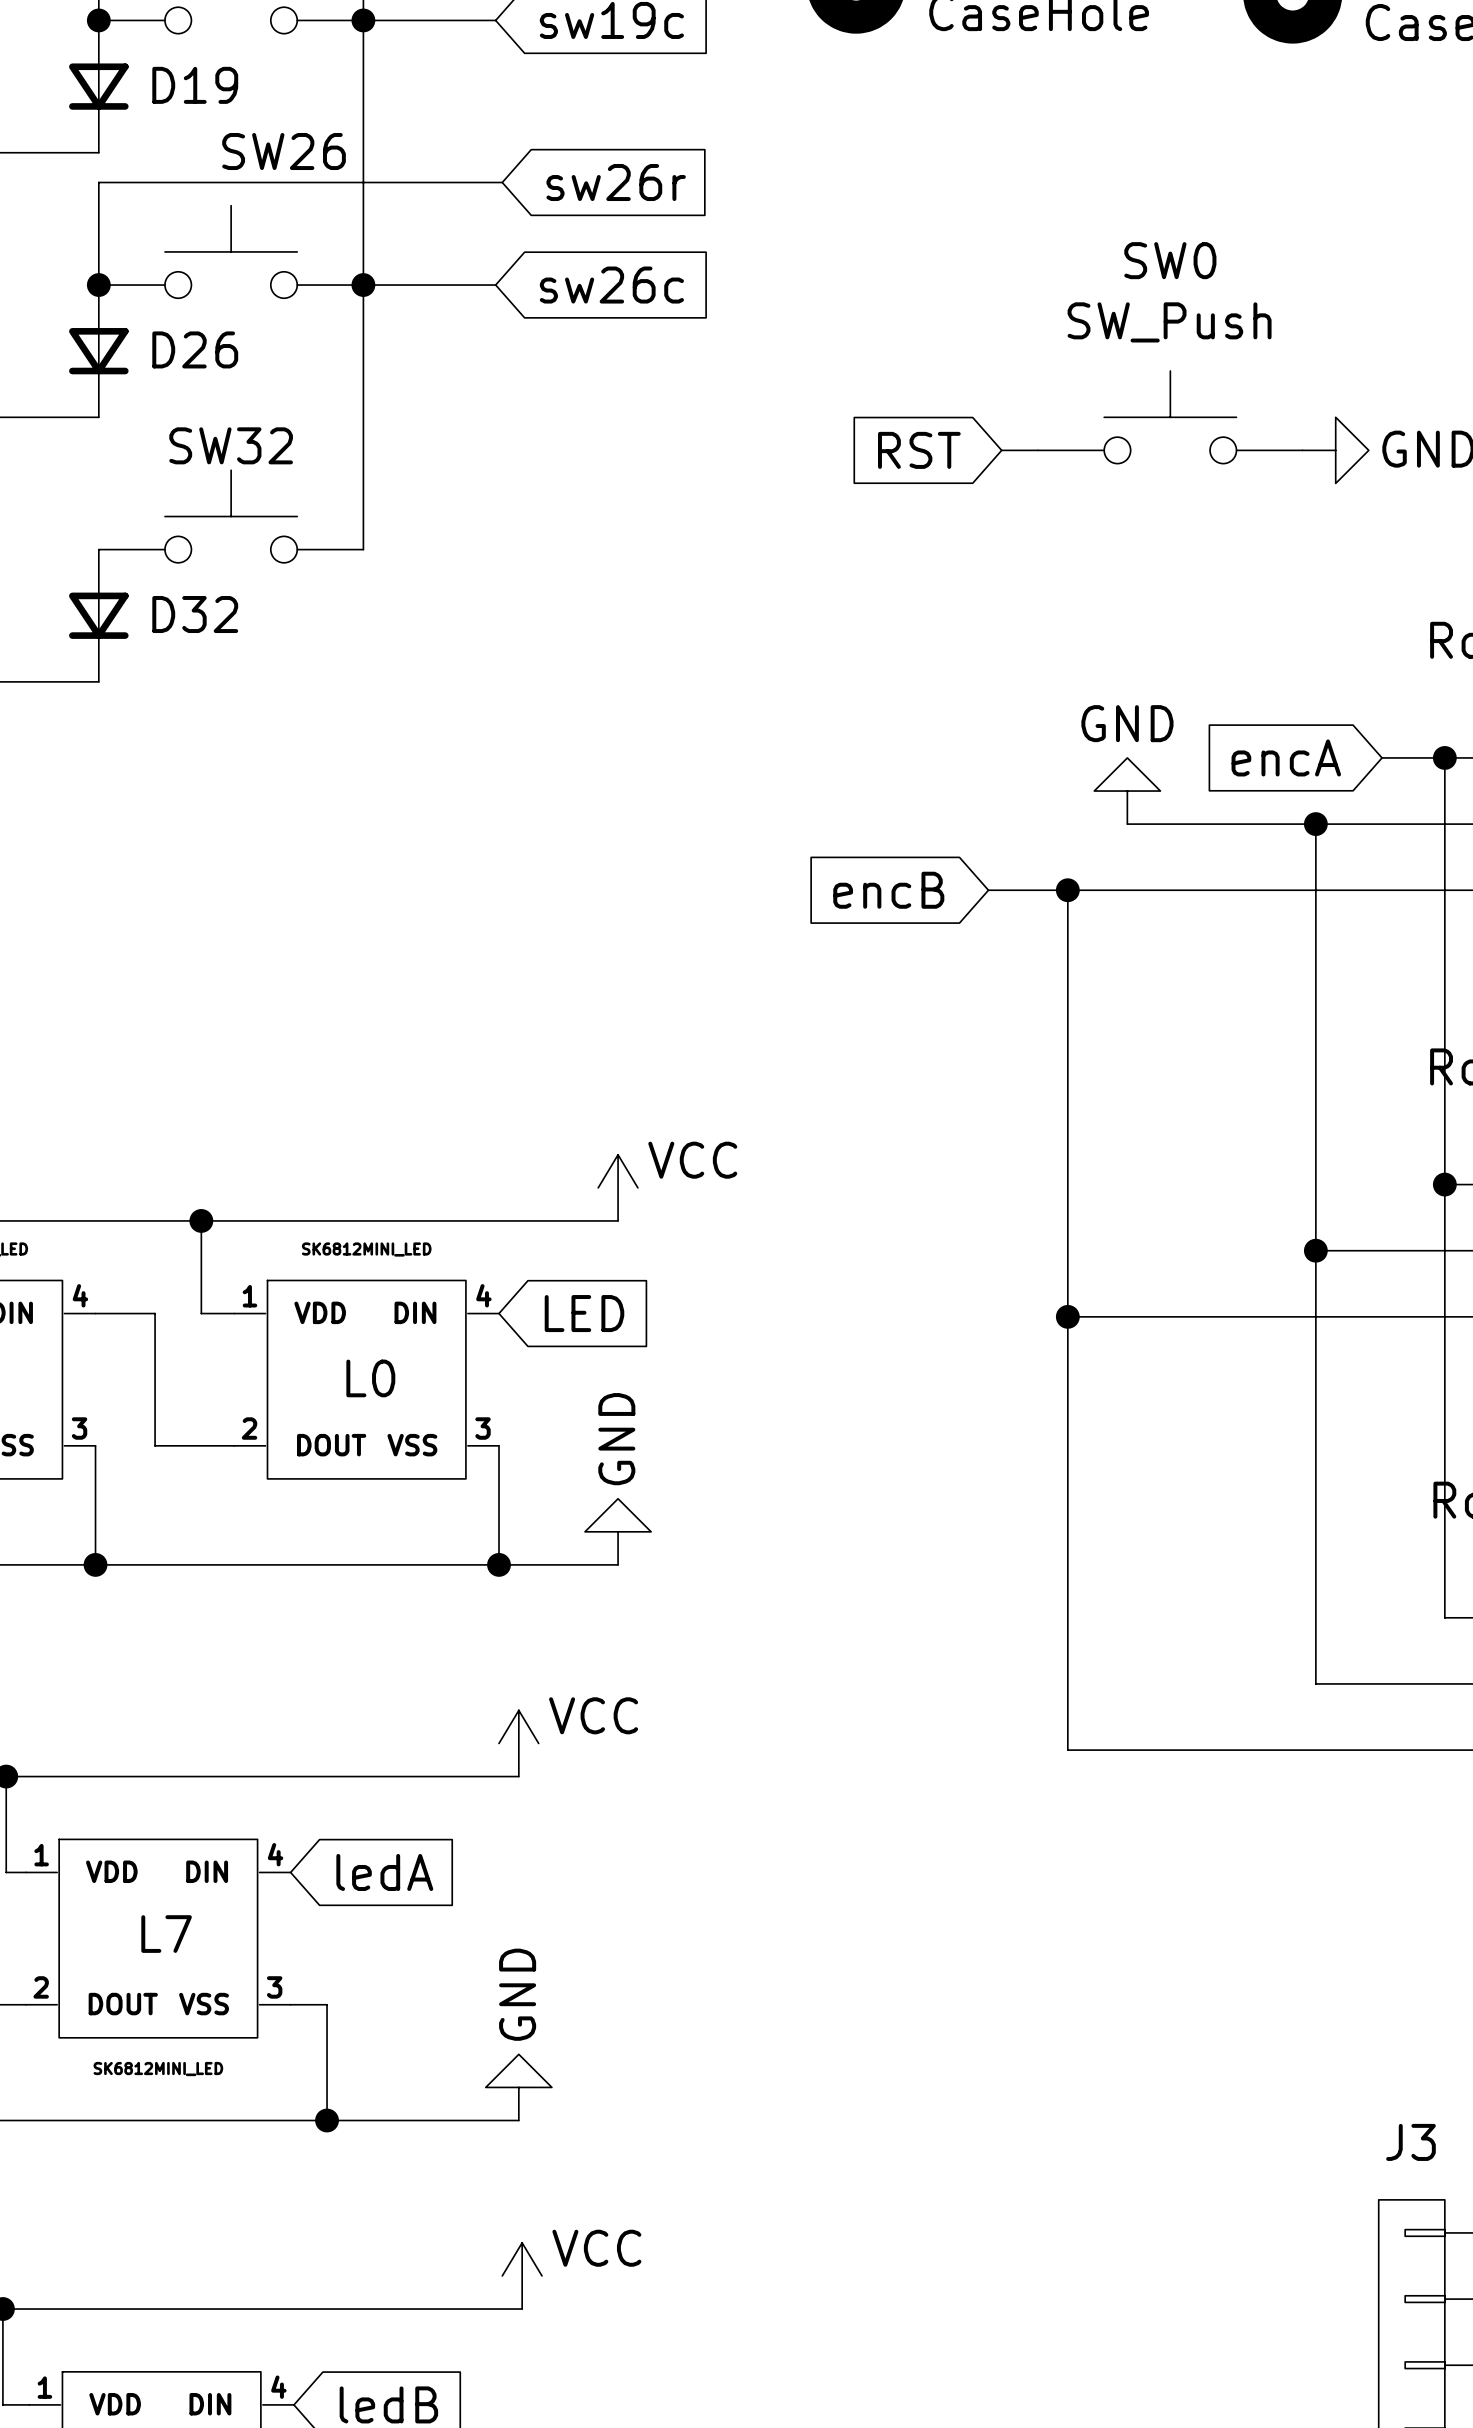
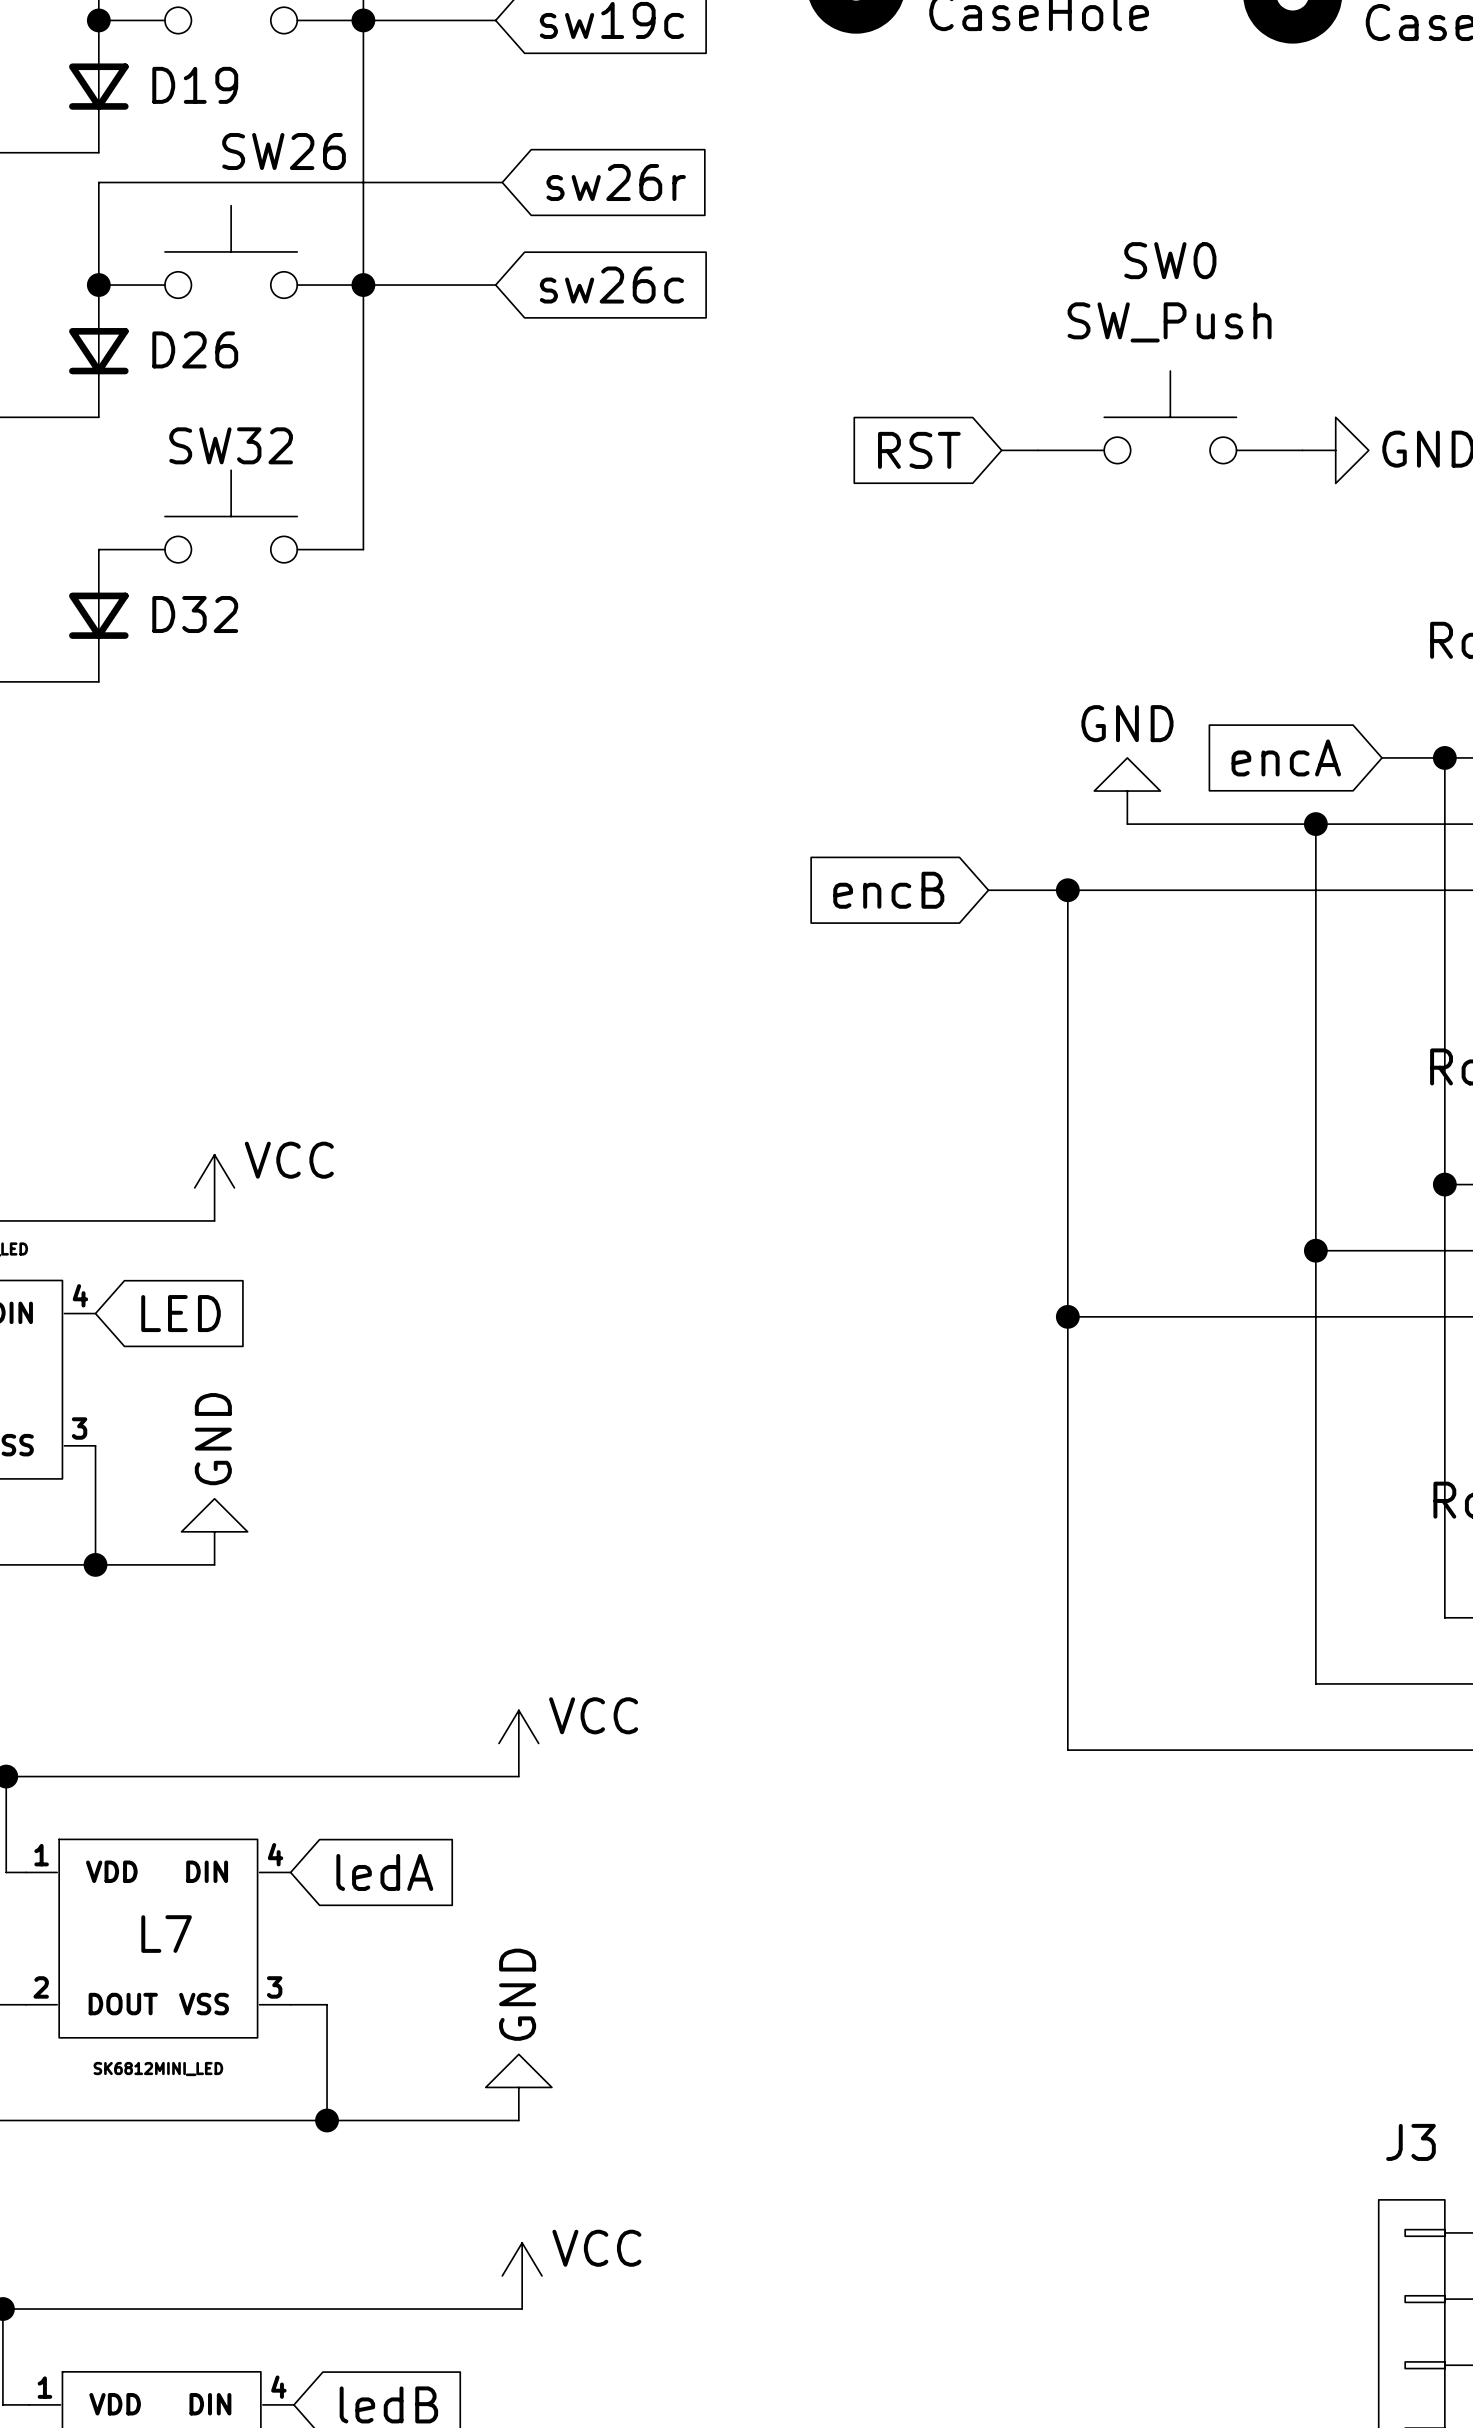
power symbol position: VCC (618, 1187) -> VCC (214, 1187)
wire: (201, 1220) (201, 1313) (234, 1313) -> none
junction: (201, 1220) -> none
wire: (214, 1220) (618, 1220) -> none
wire: (95, 1313) (155, 1313) (155, 1445) (234, 1445) -> none
global label position: LED (584, 1313) -> LED (181, 1313)
L0: SK6812MINI_LED (366, 1379) -> none
wire: (499, 1445) (499, 1564) -> none
power symbol position: GND (618, 1531) -> GND (214, 1531)
wire: (214, 1564) (618, 1564) -> none
junction: (499, 1564) -> none

